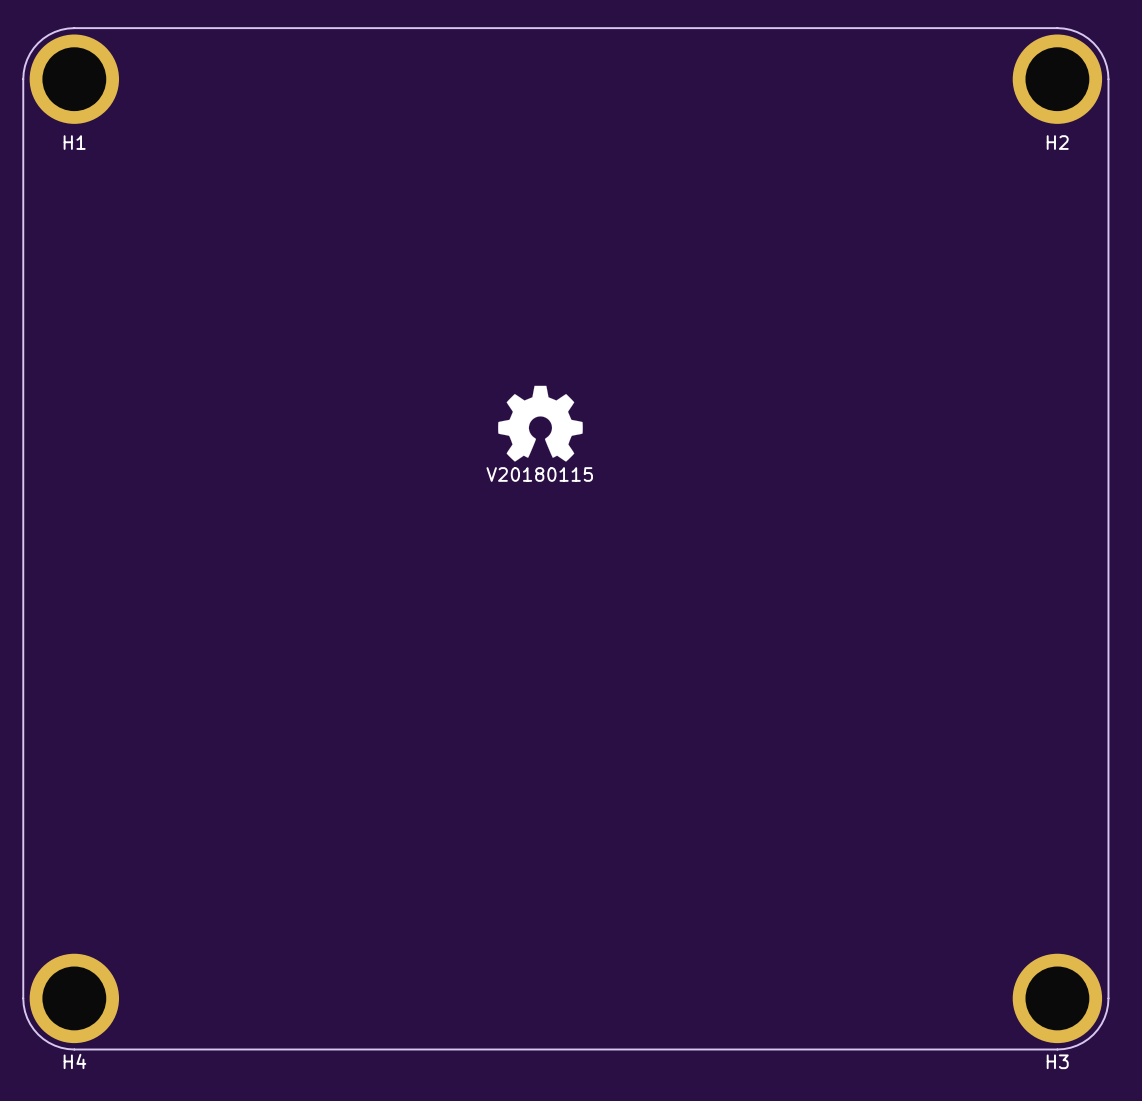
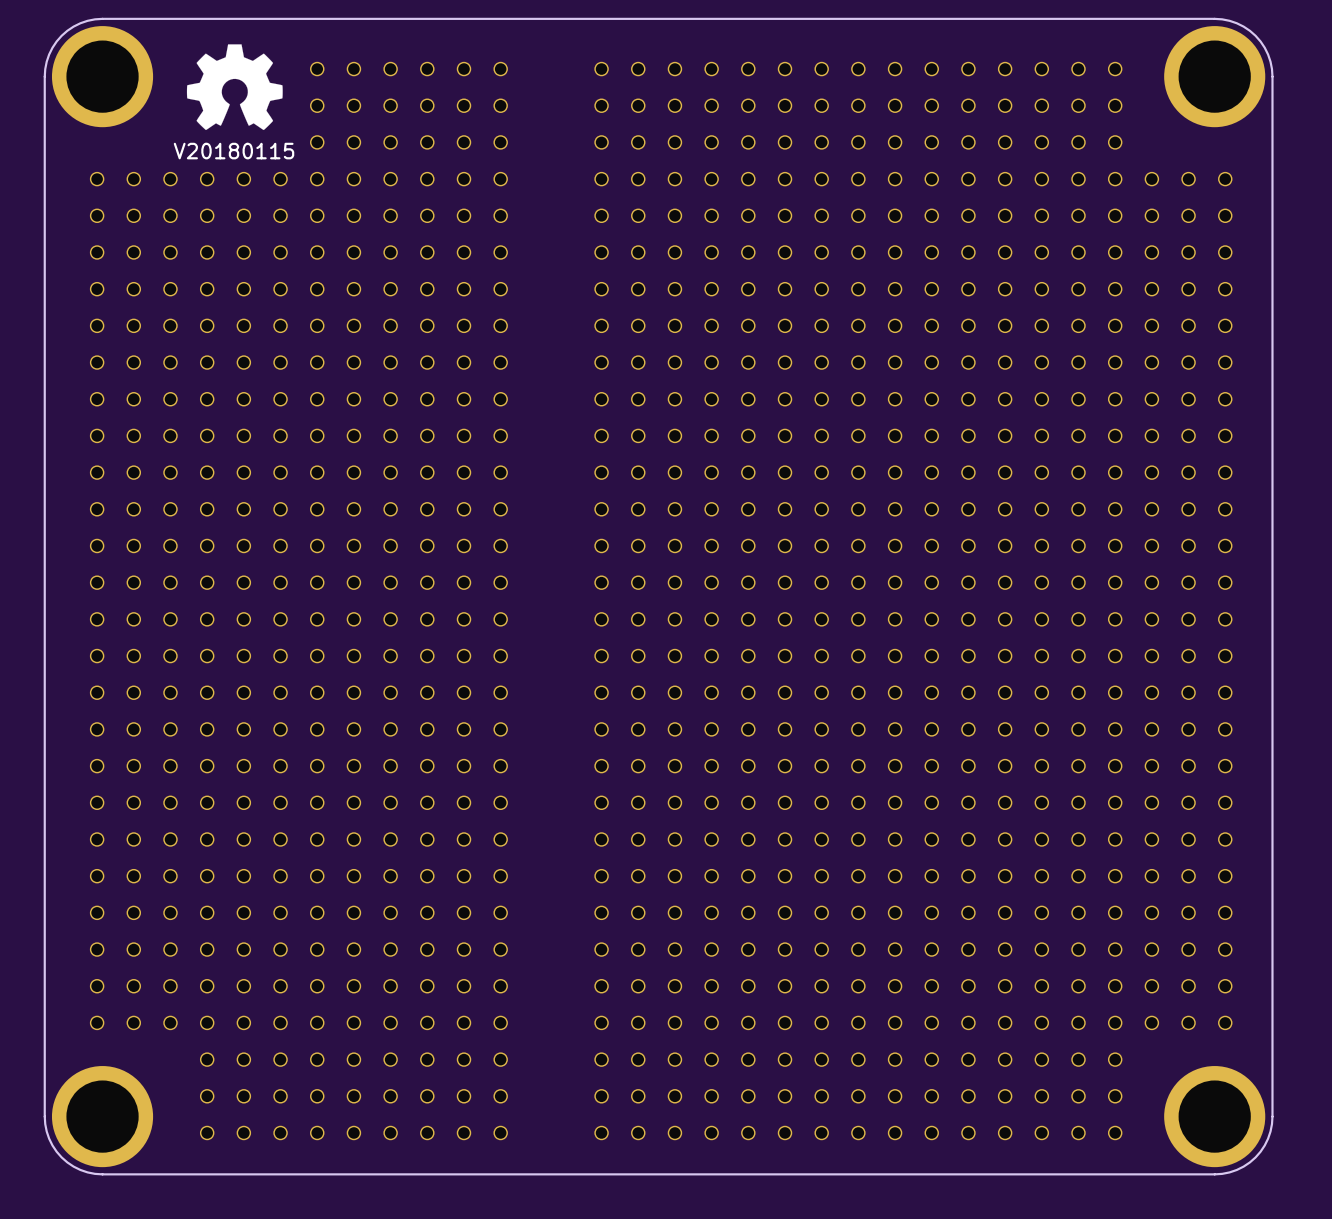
drawing: none -> [186, 44, 283, 131]
part: none -> (1078, 105)
H1 name: H1 (74, 142) -> none
H2 name: H2 (1057, 142) -> none
part: none -> (408, 160)
part: none -> (693, 160)
part: none -> (913, 160)
part: none -> (188, 270)
part: none -> (1133, 270)
part: none -> (408, 380)
part: none -> (693, 380)
part: none -> (913, 380)
drawing: [498, 385, 583, 462] -> none
part: none -> (188, 490)
part: none -> (1133, 490)
part: none -> (408, 601)
part: none -> (693, 601)
part: none -> (913, 601)
part: none -> (188, 711)
part: none -> (1133, 711)
part: none -> (408, 821)
part: none -> (693, 821)
part: none -> (913, 821)
part: none -> (188, 931)
part: none -> (1133, 931)
part: none -> (408, 1041)
part: none -> (693, 1041)
part: none -> (913, 1041)
part: none -> (243, 1096)
part: none -> (1078, 1096)
H4 name: H4 (74, 1061) -> none
H3 name: H3 (1057, 1061) -> none

